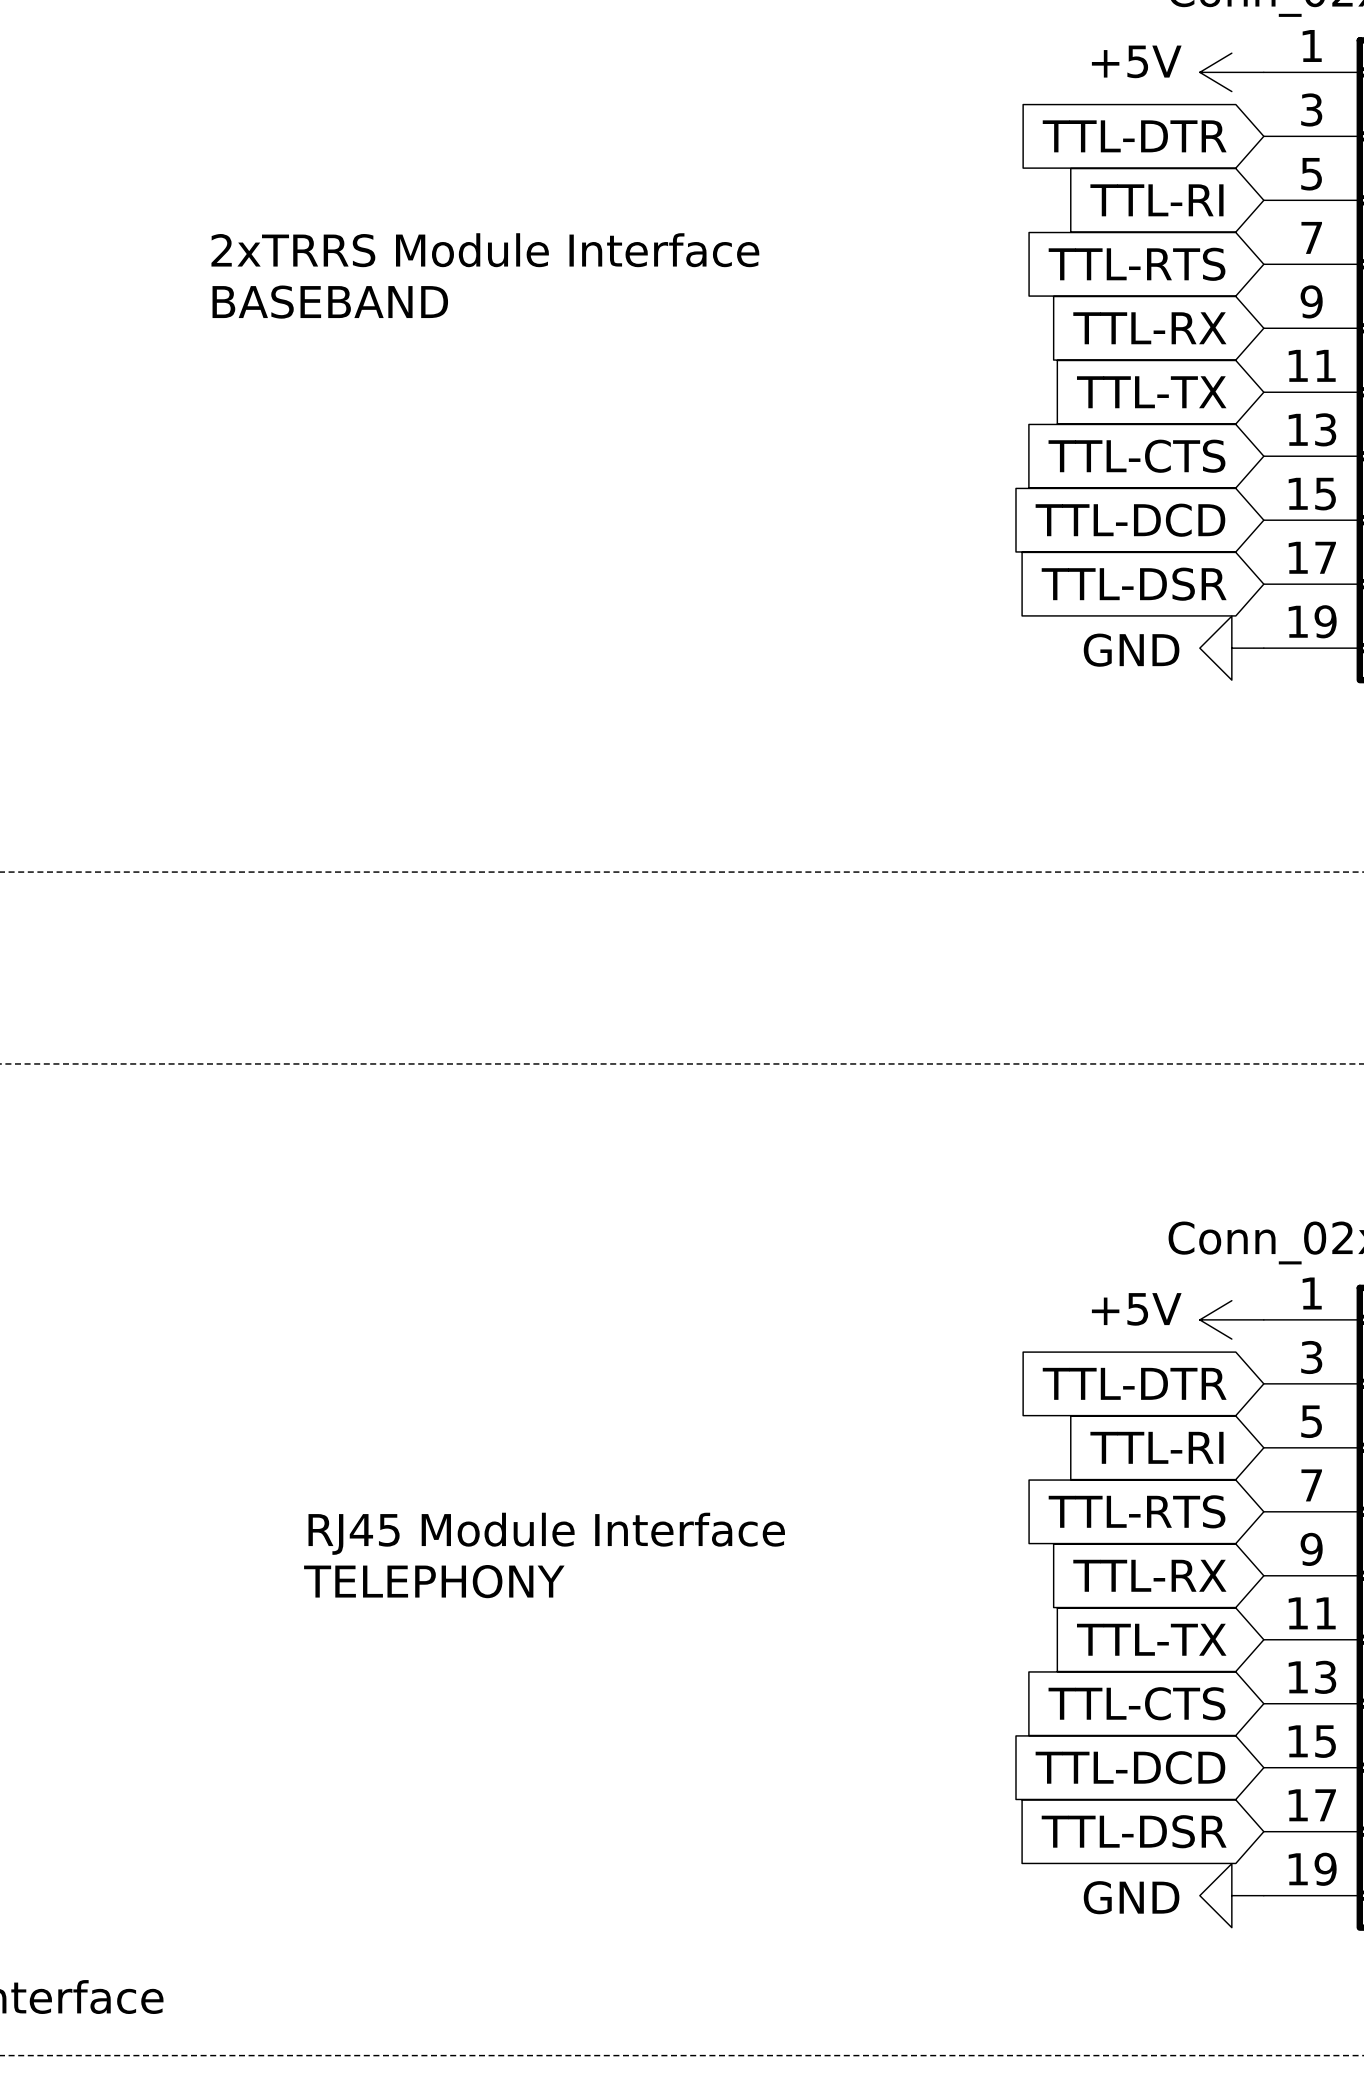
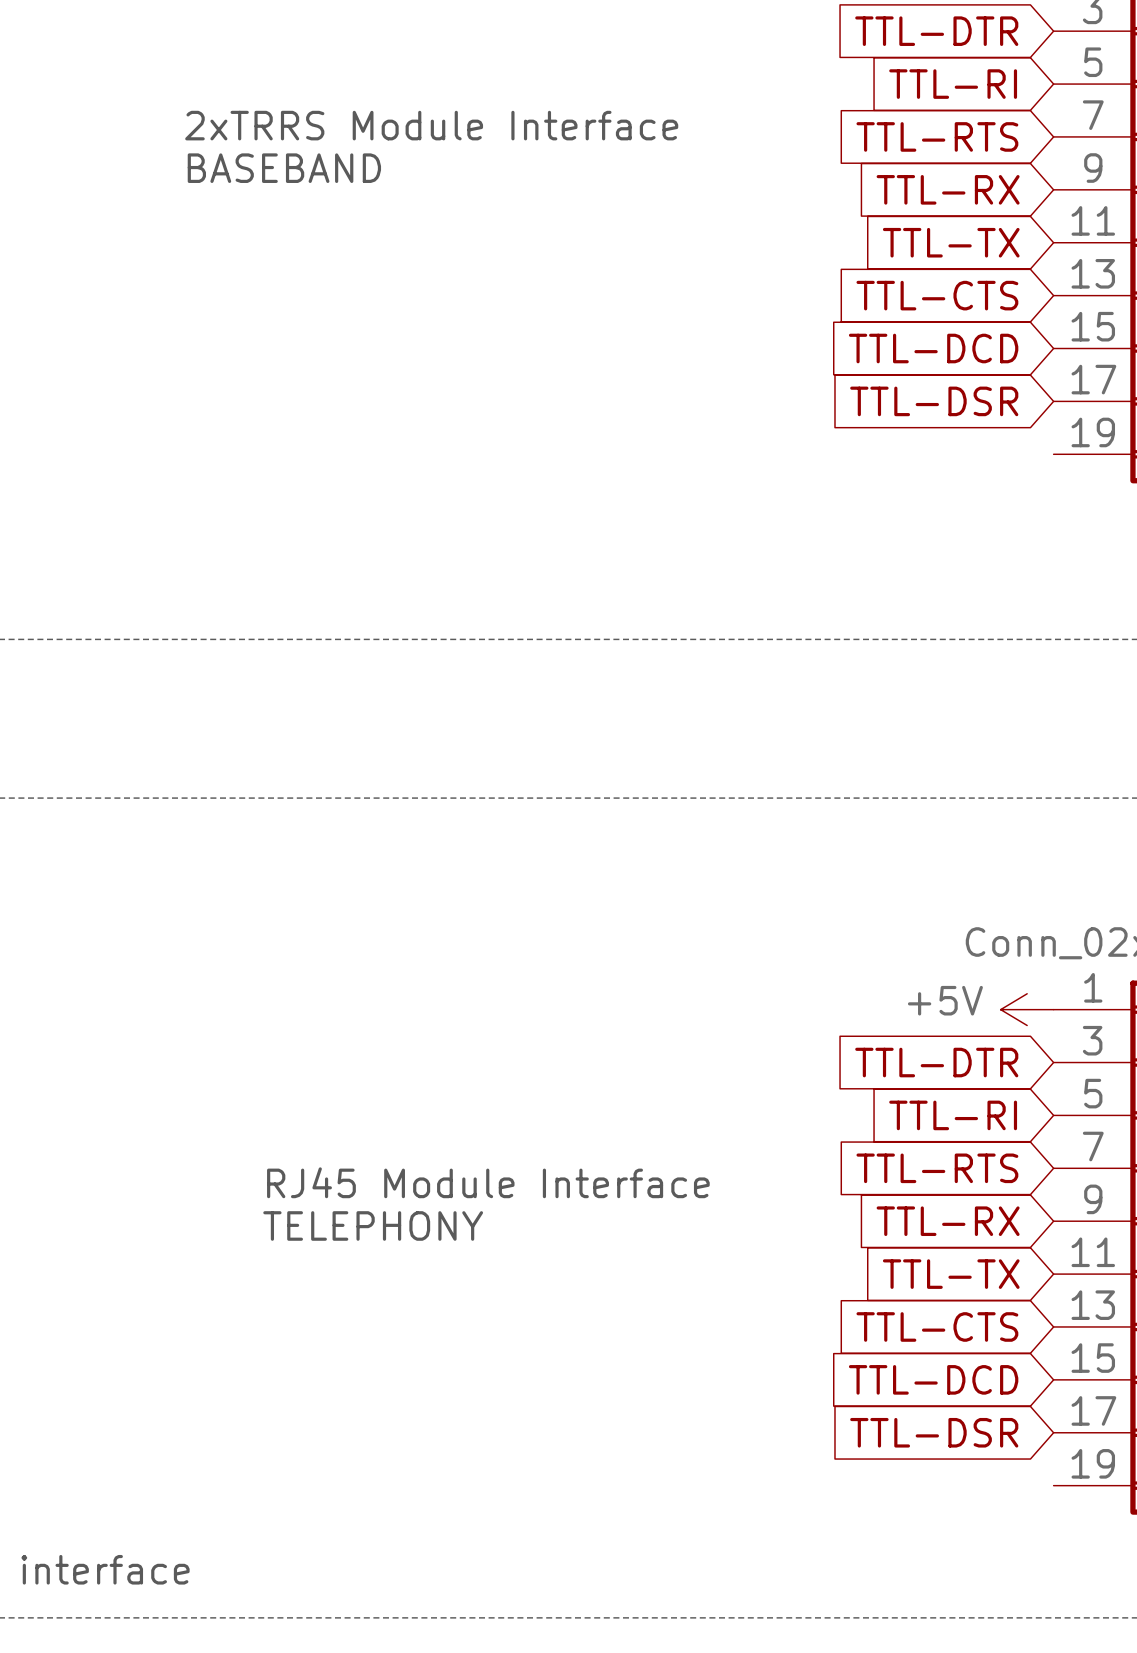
power symbol: GND (1231, 648) -> none
power symbol: GND (1231, 1895) -> none

